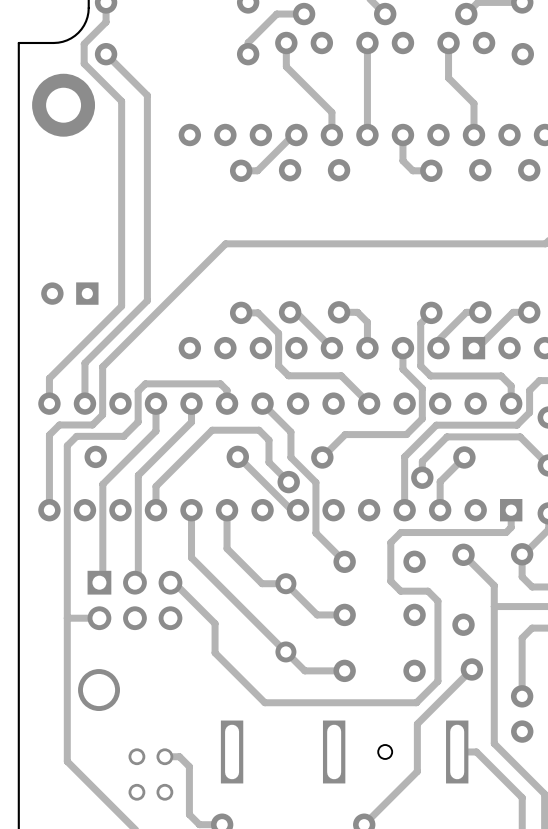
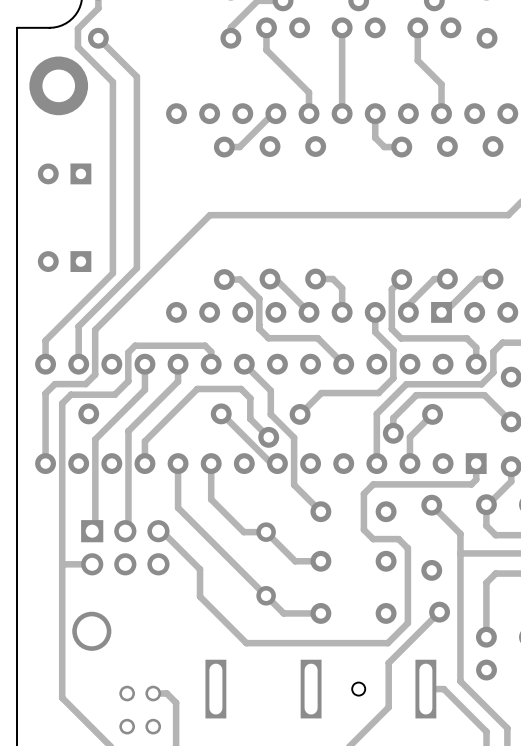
part: none -> (64, 173)

